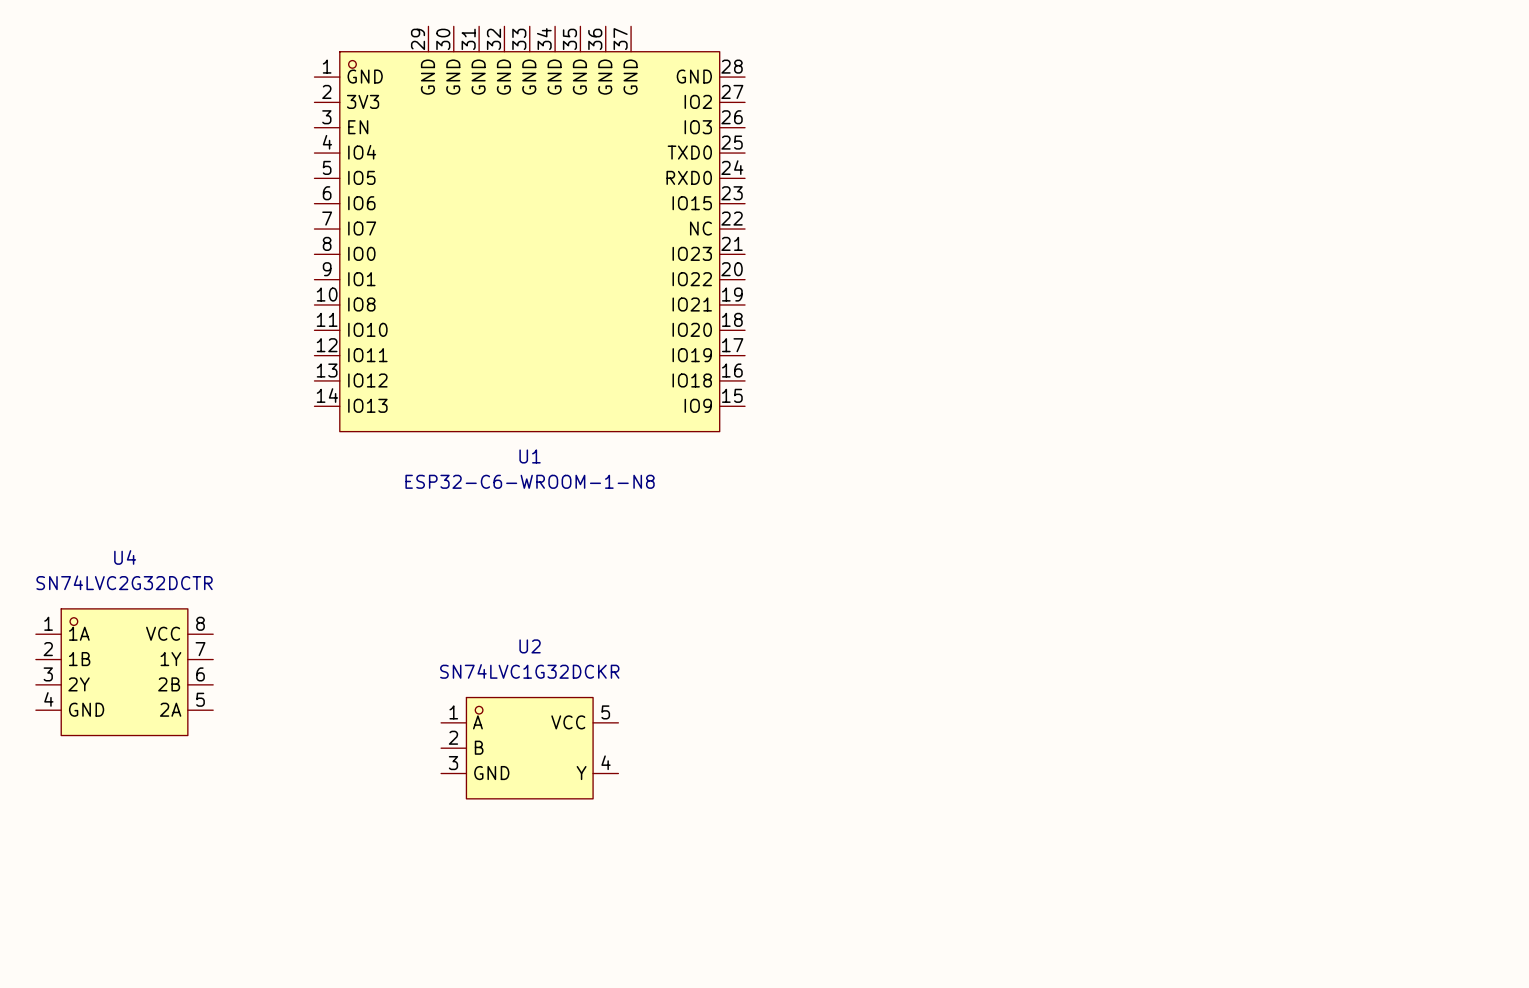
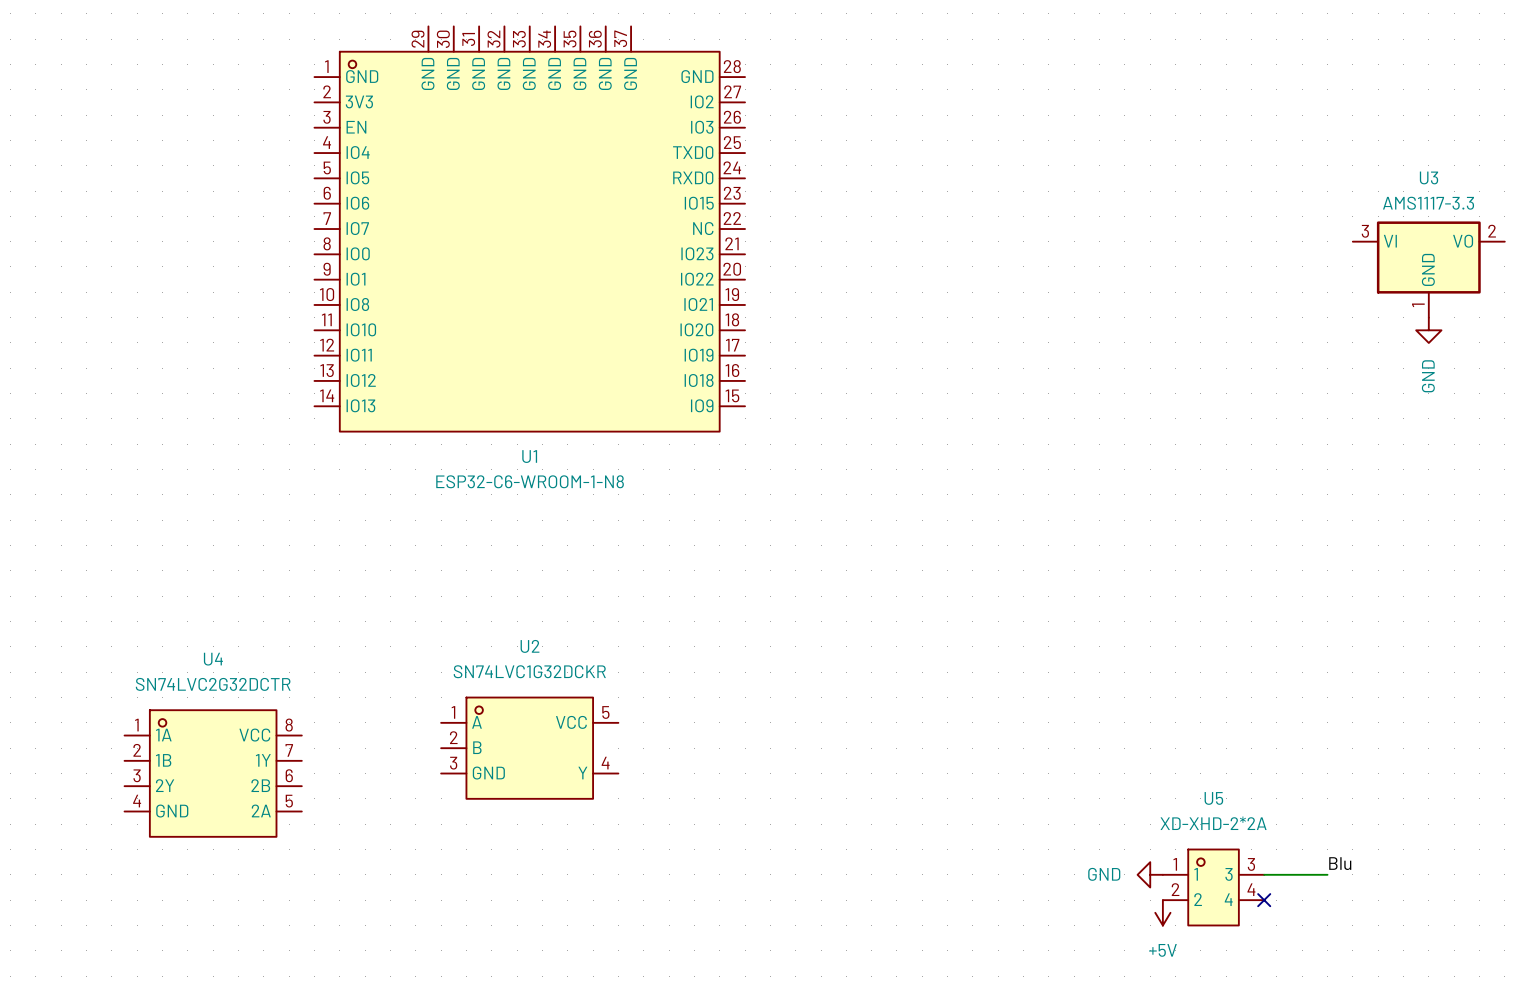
U3: none -> AMS1117-3.3 (1428, 269)
power symbol: none -> GND (1428, 330)
U4 position: (124, 672) -> (213, 773)
label: none -> Blu (1340, 863)
power symbol: none -> GND (1150, 874)
wire: none -> (1264, 874) (1327, 874)
U5: none -> XD-XHD-2*2A (1213, 887)
no-connect mark: none -> (1264, 900)
power symbol: none -> +5V (1162, 912)

